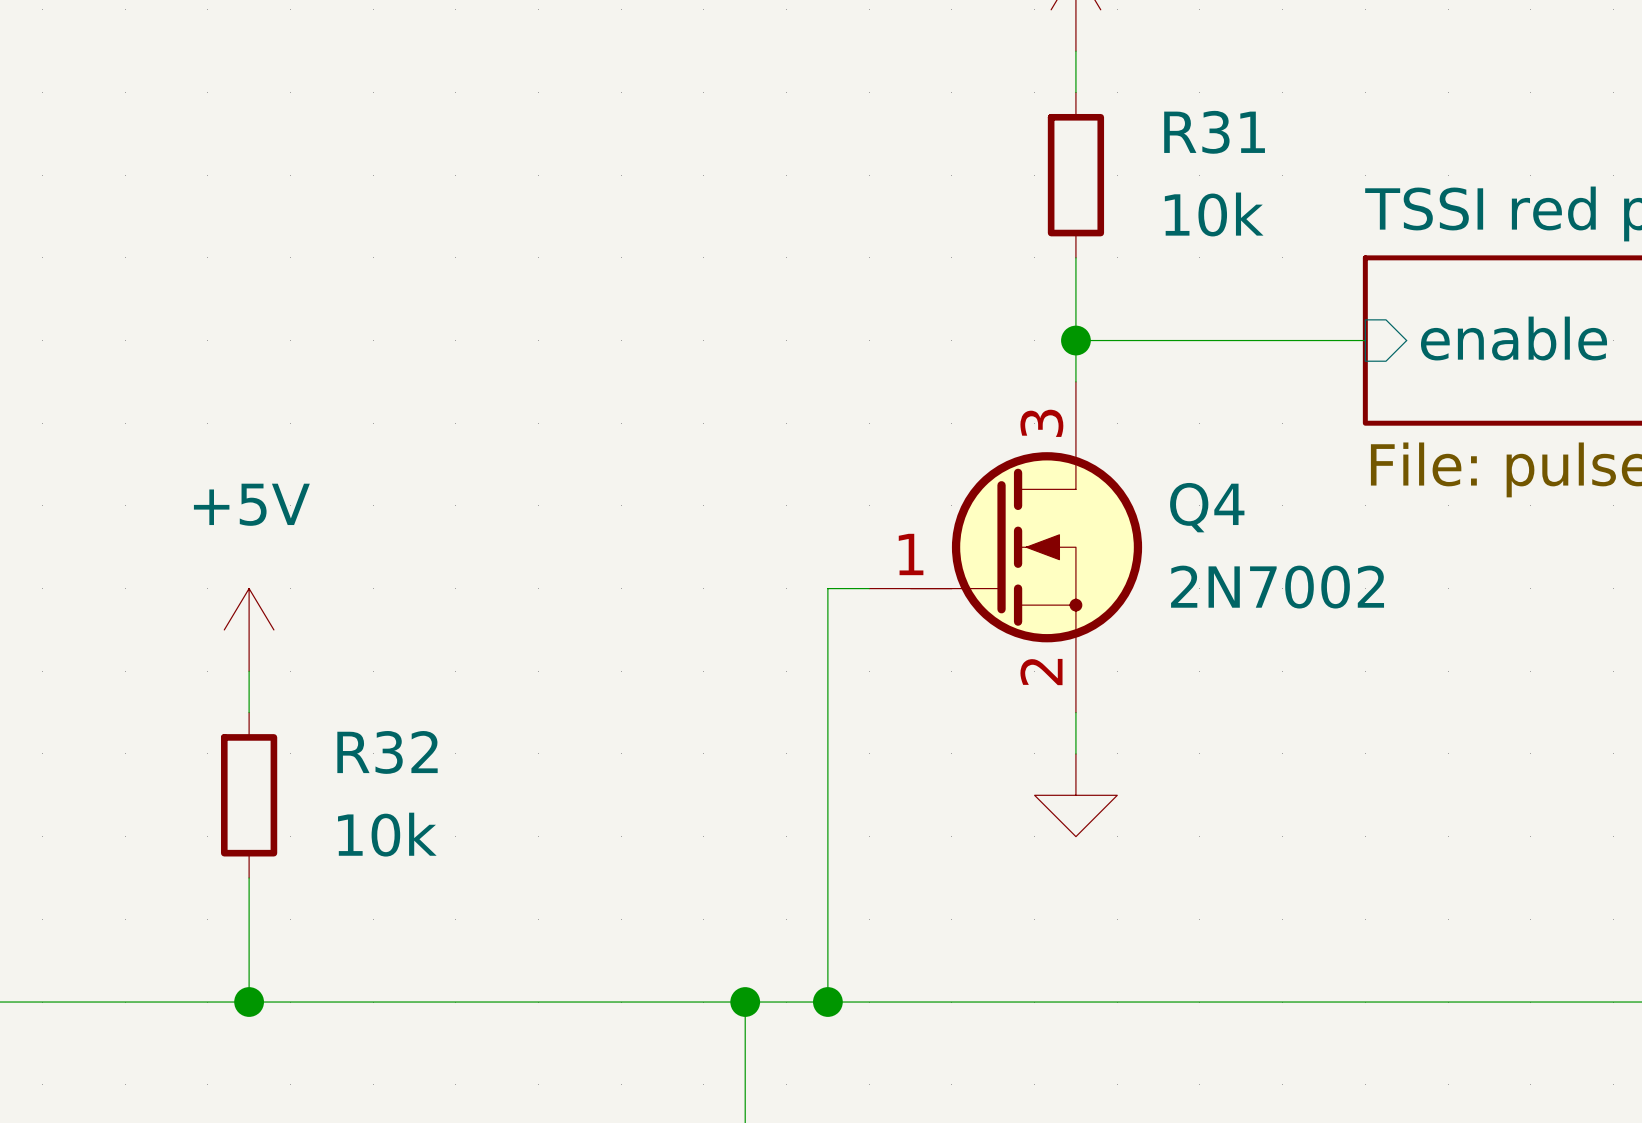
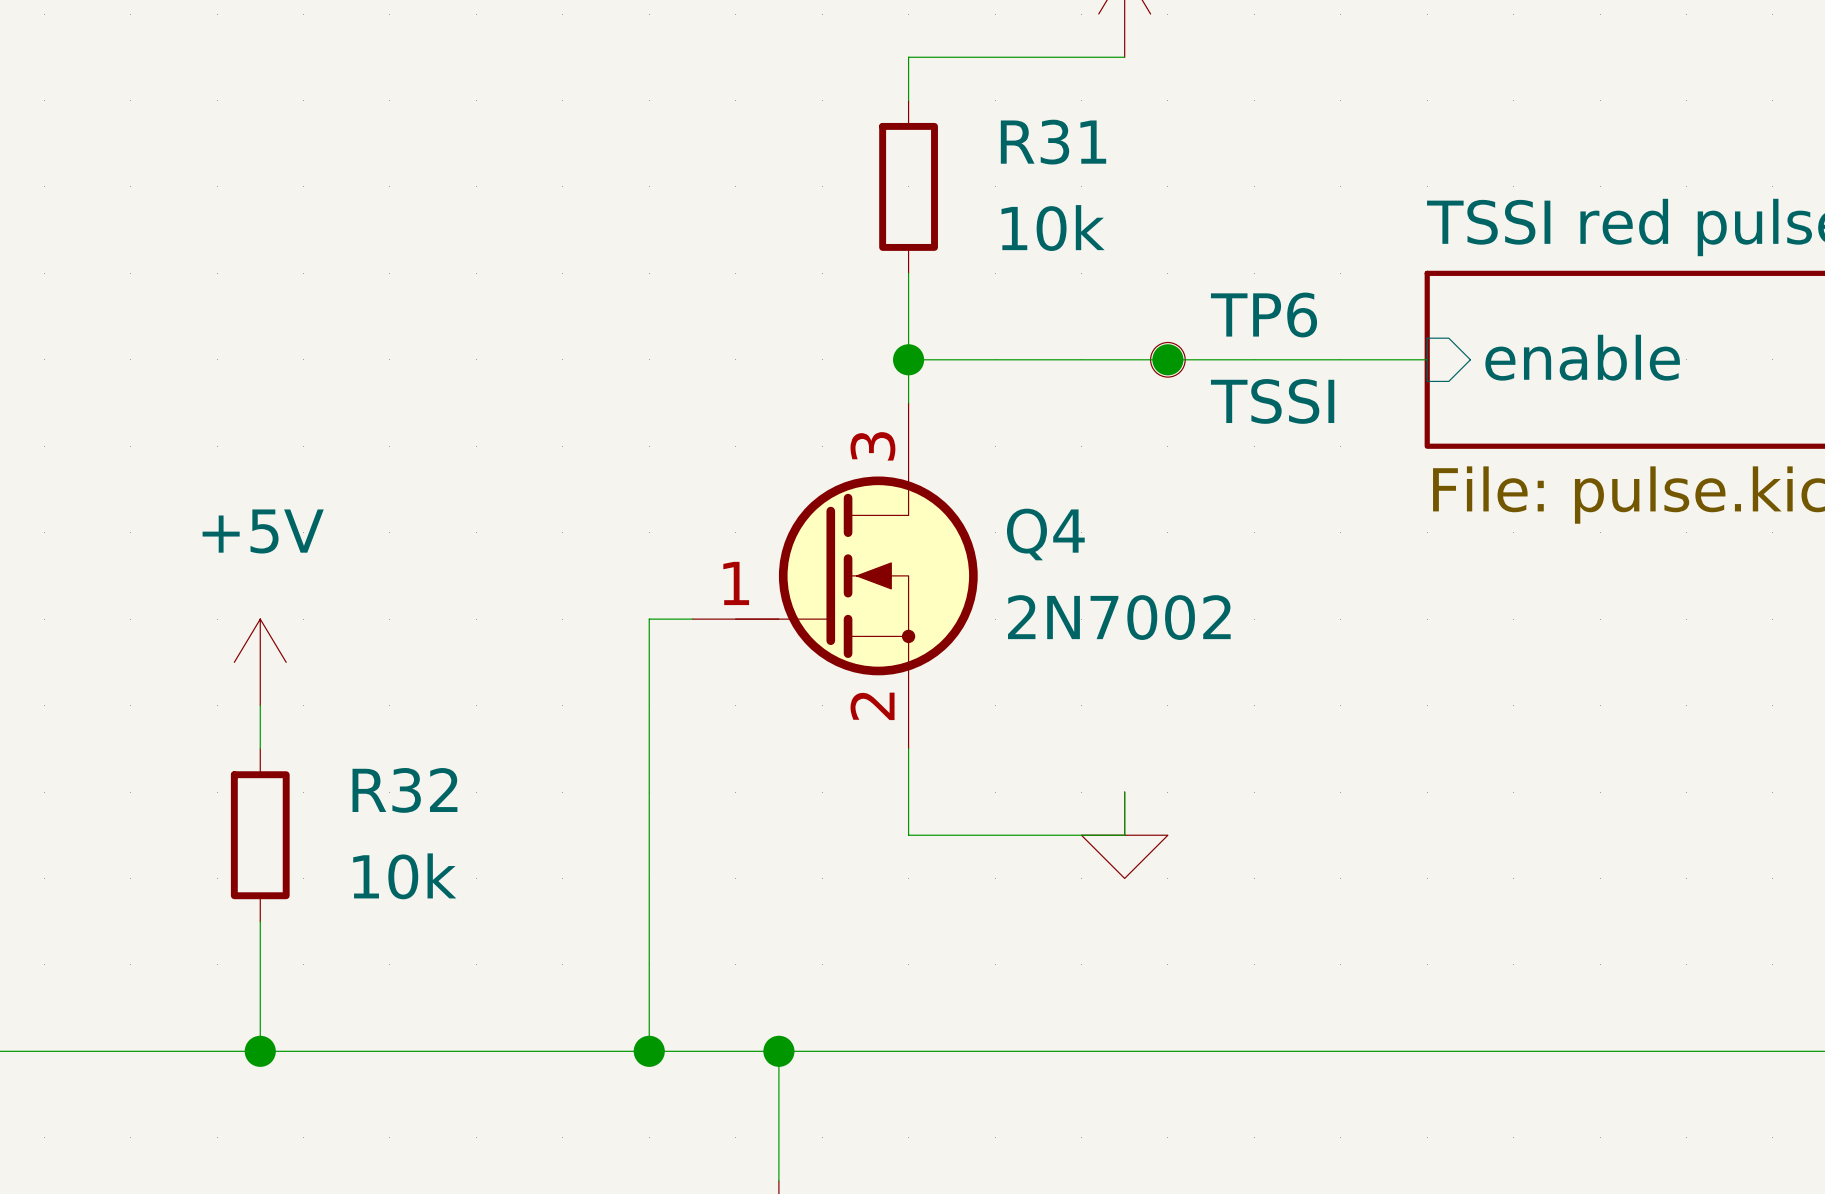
wire: (1075, 51) (1075, 92) -> (1124, 57) (908, 57) (908, 100)
R31 position: (1075, 175) -> (908, 186)
wire: (1075, 257) (1075, 381) -> (908, 273) (908, 403)
wire: none -> (908, 359) (1124, 359)
junction: none -> (908, 359)
junction position: (1075, 340) -> (1167, 359)
TP6: none -> TSSI (1167, 359)
Q4 position: (1005, 547) -> (835, 575)
wire: (869, 588) (827, 588) (827, 1002) -> (692, 619) (649, 619) (649, 1051)
wire: (1075, 712) (1075, 753) -> (908, 748) (908, 835) (1124, 835) (1124, 792)
junction: none -> (649, 1051)
junction: (827, 1002) -> none

